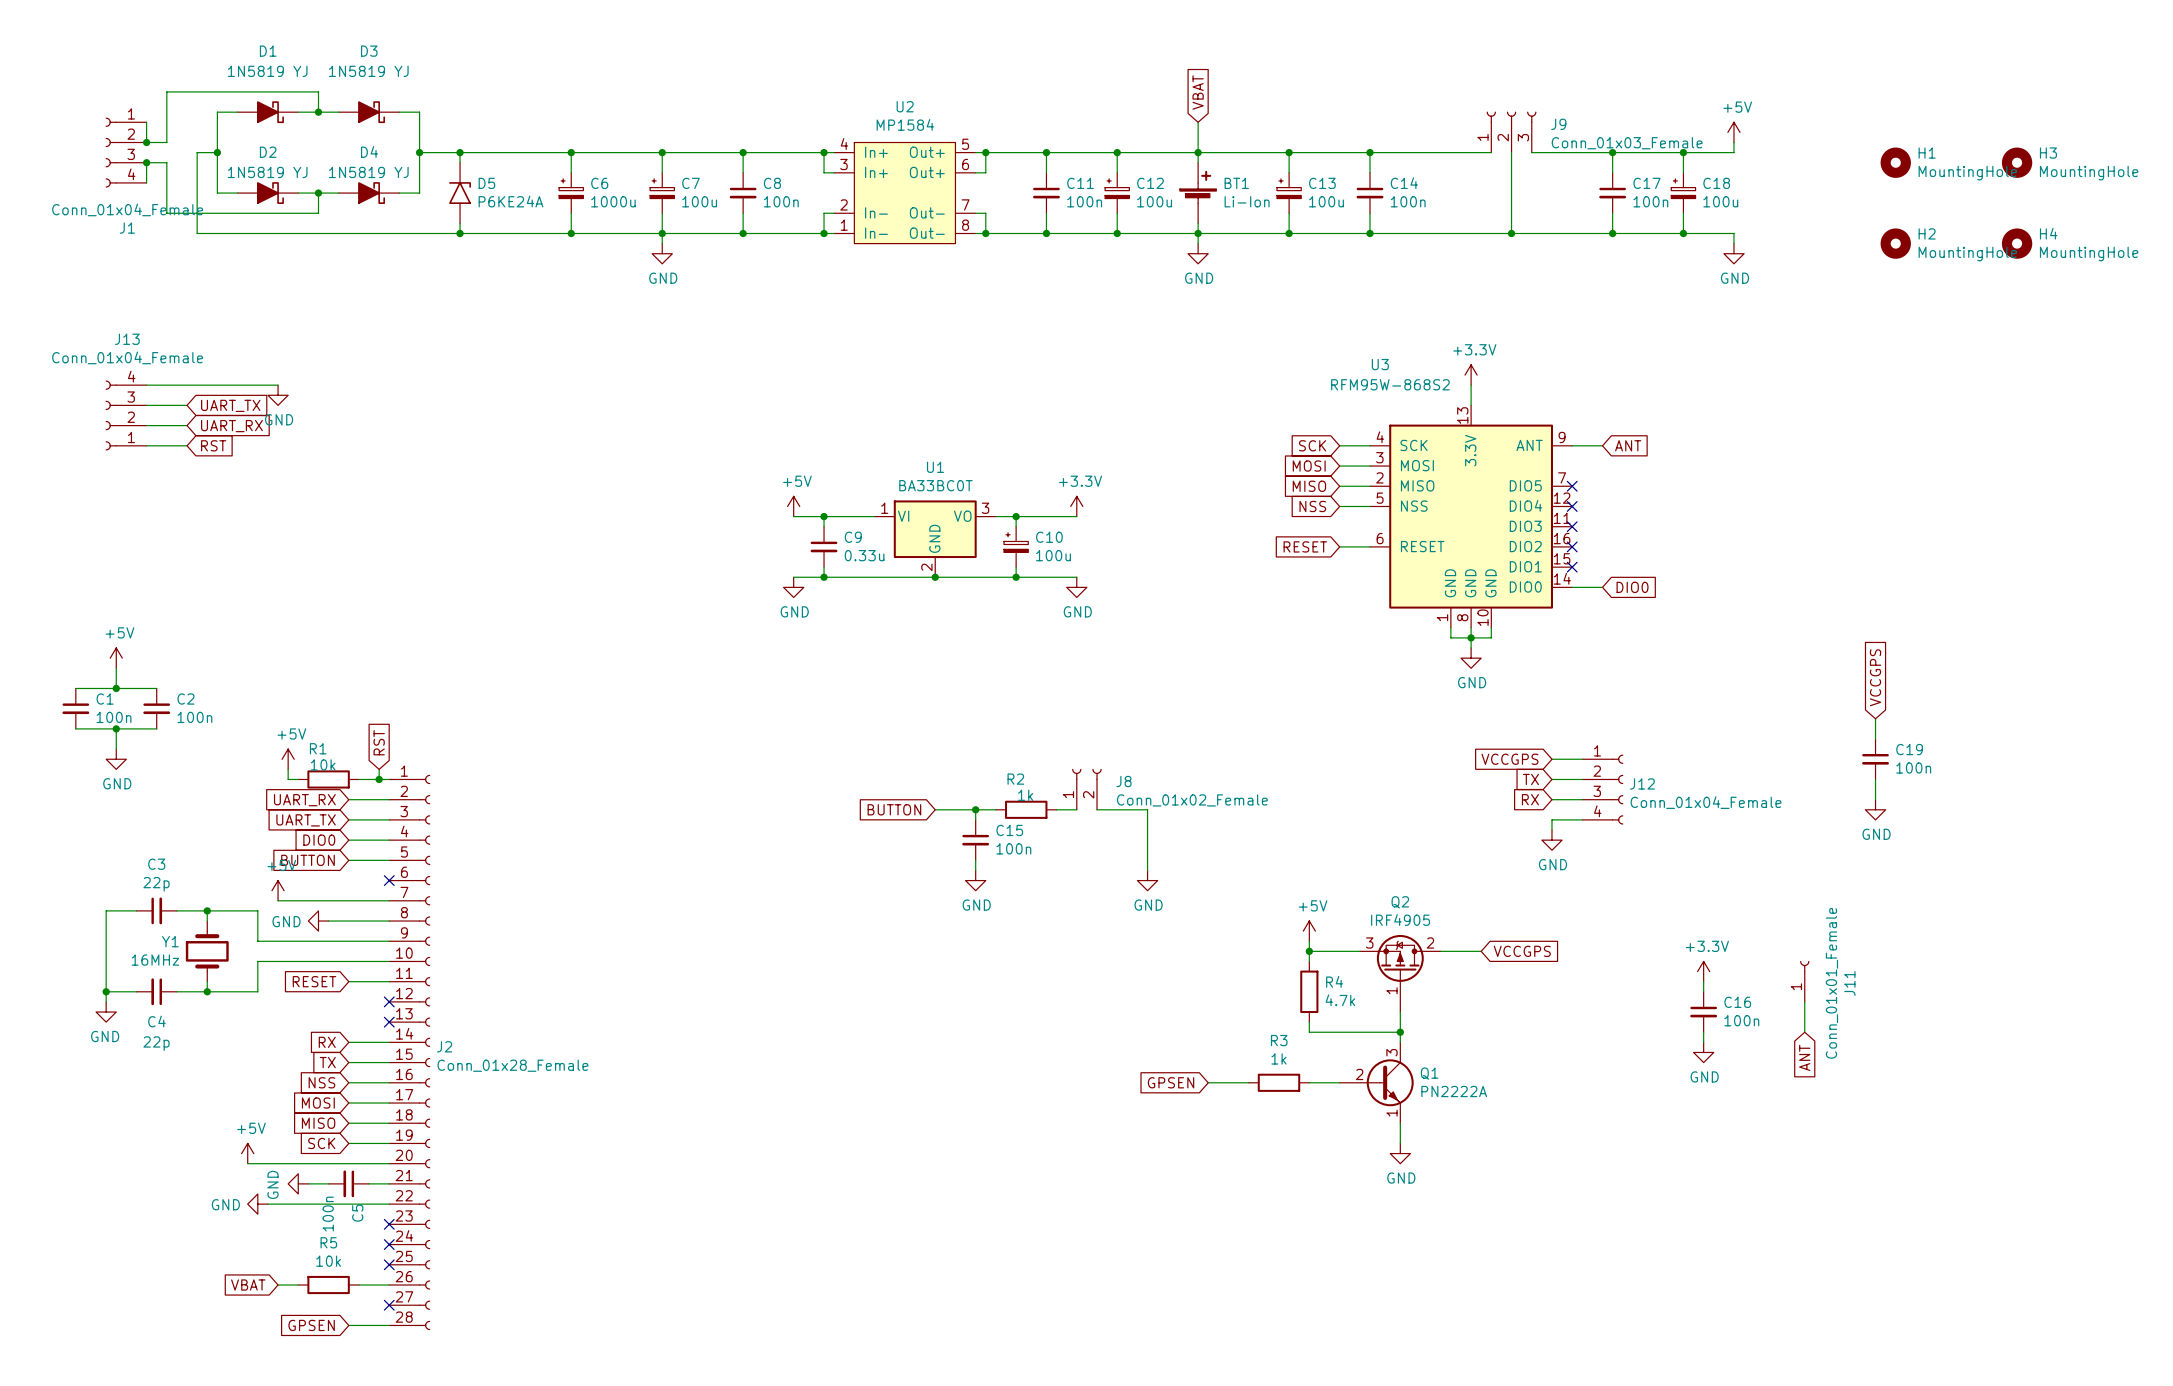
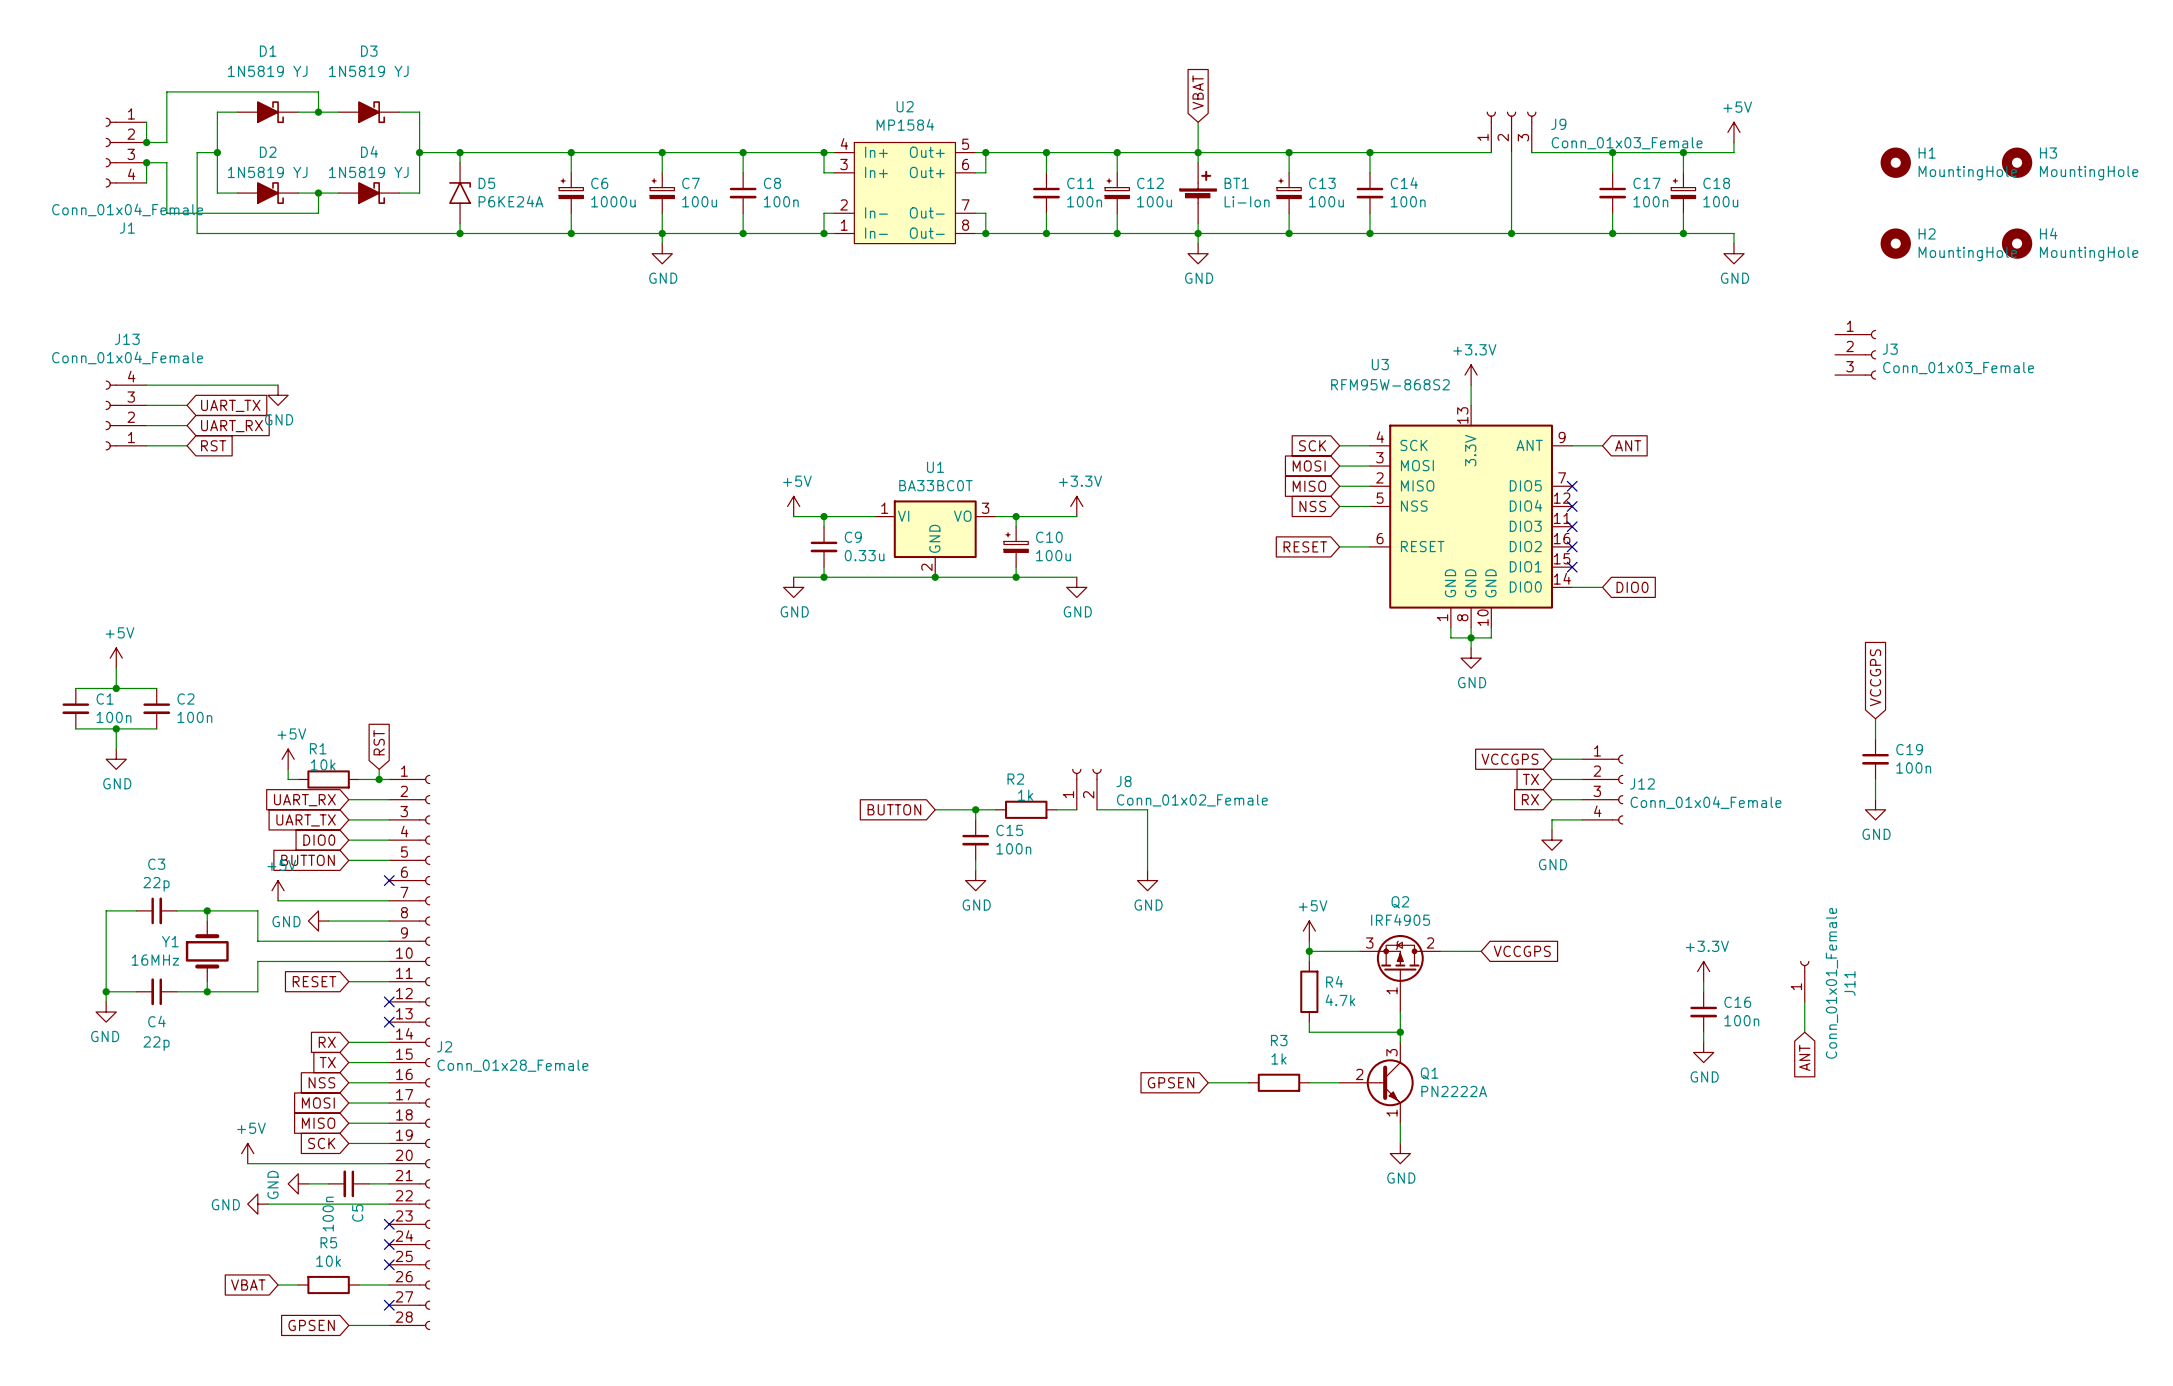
J3: none -> Conn_01x03_Female (1855, 354)

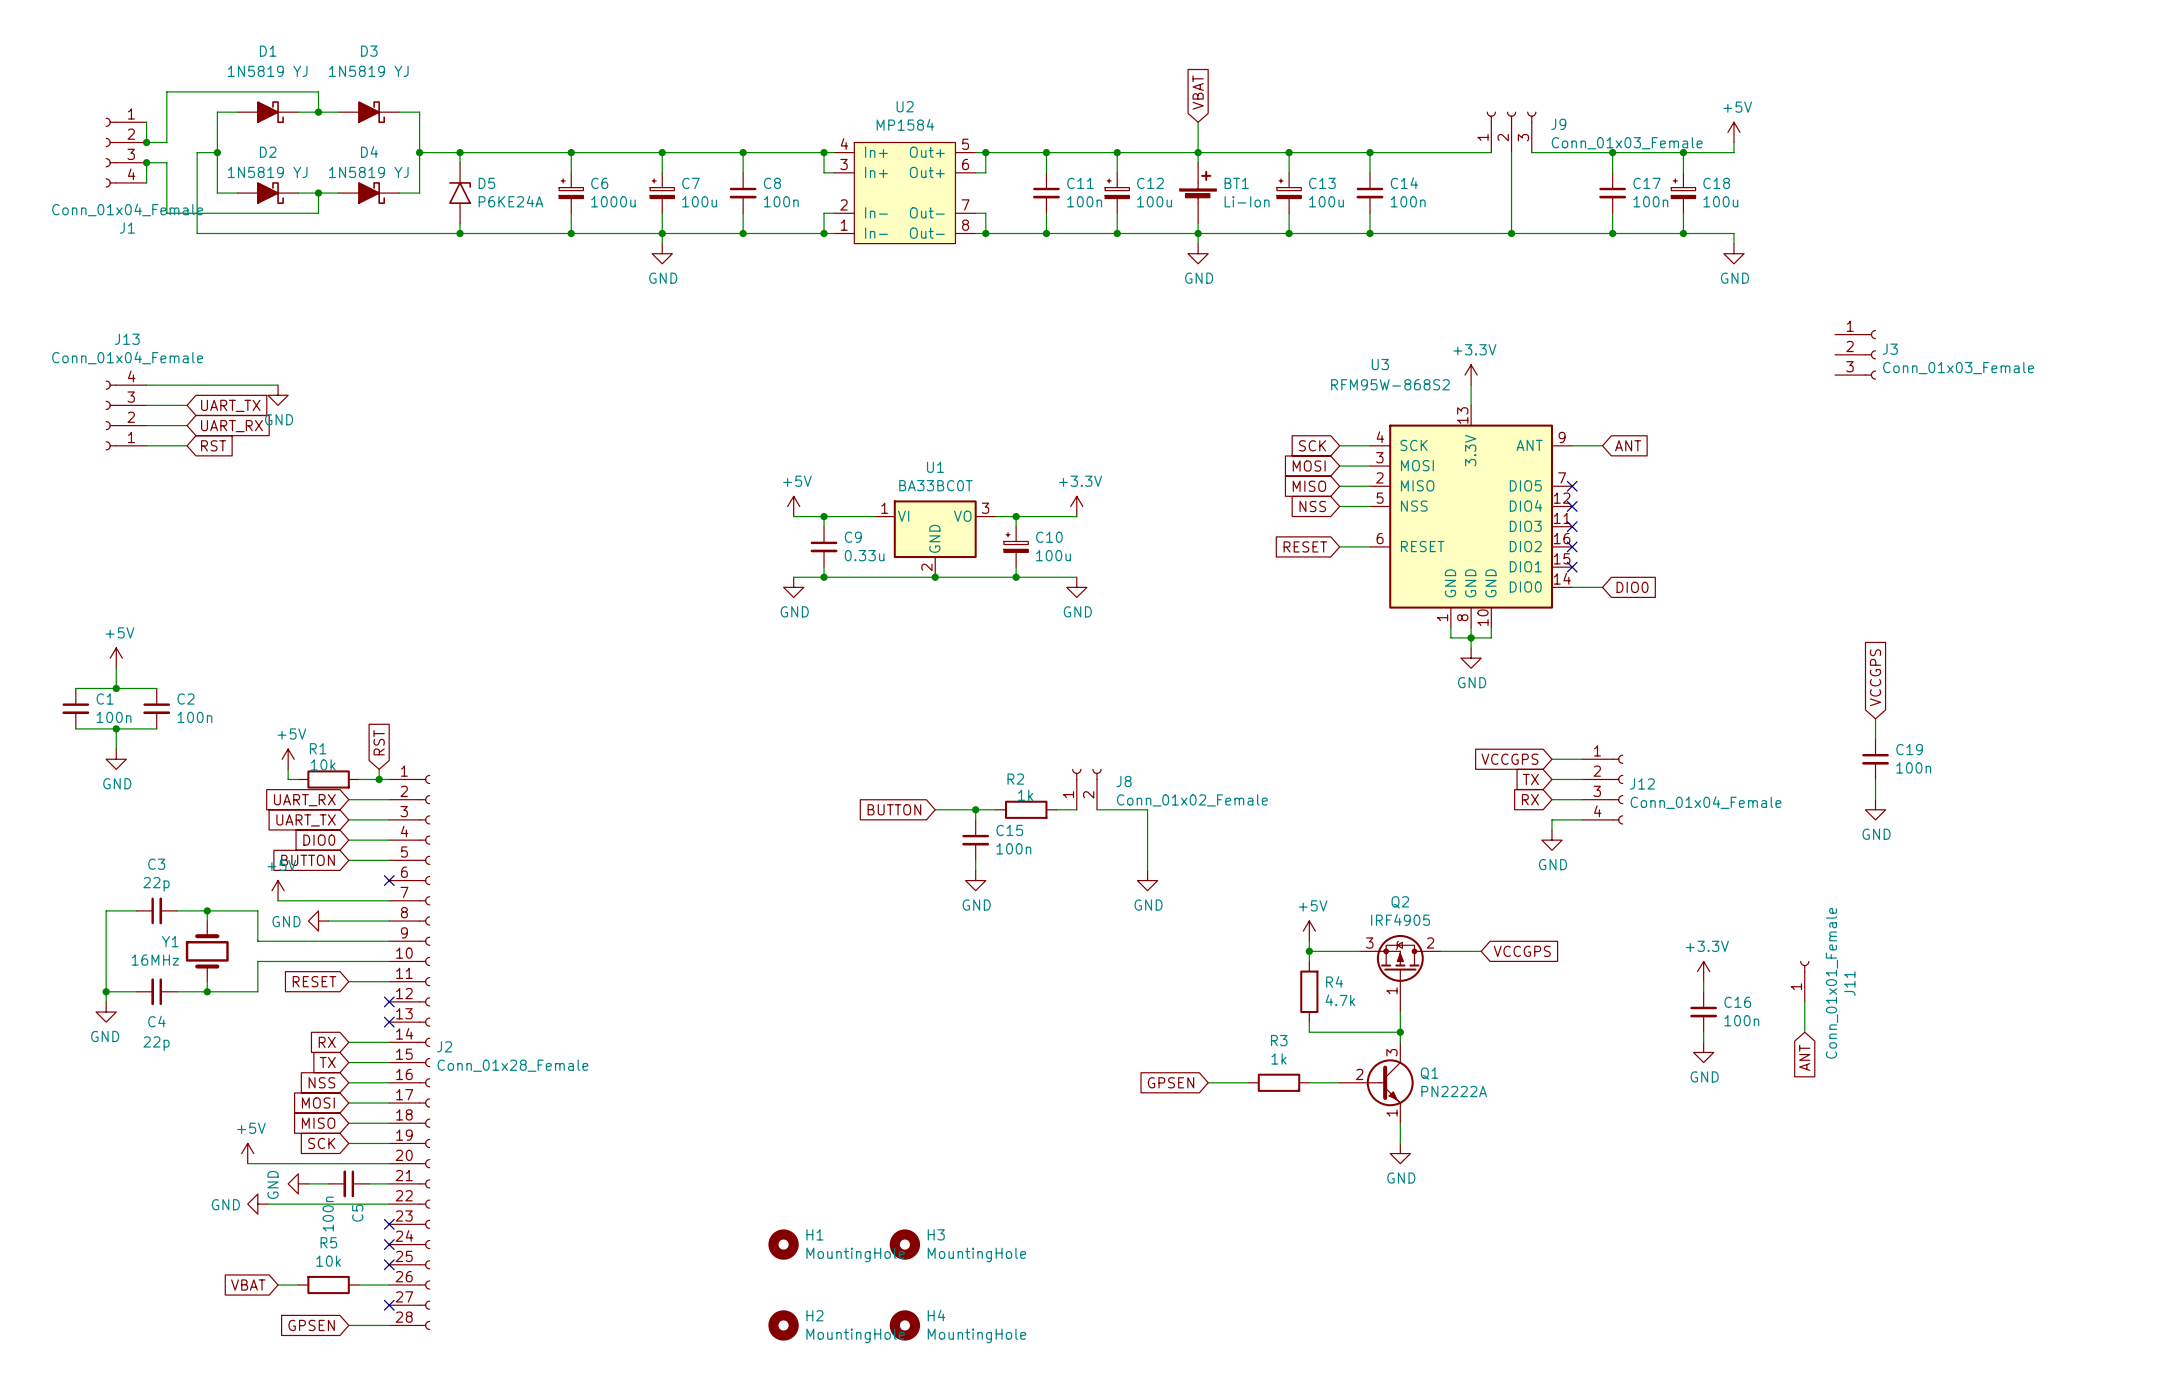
H1 position: (1895, 162) -> (783, 1244)
H3 position: (2017, 162) -> (904, 1244)
H2 position: (1895, 243) -> (783, 1325)
H4 position: (2017, 243) -> (904, 1325)

